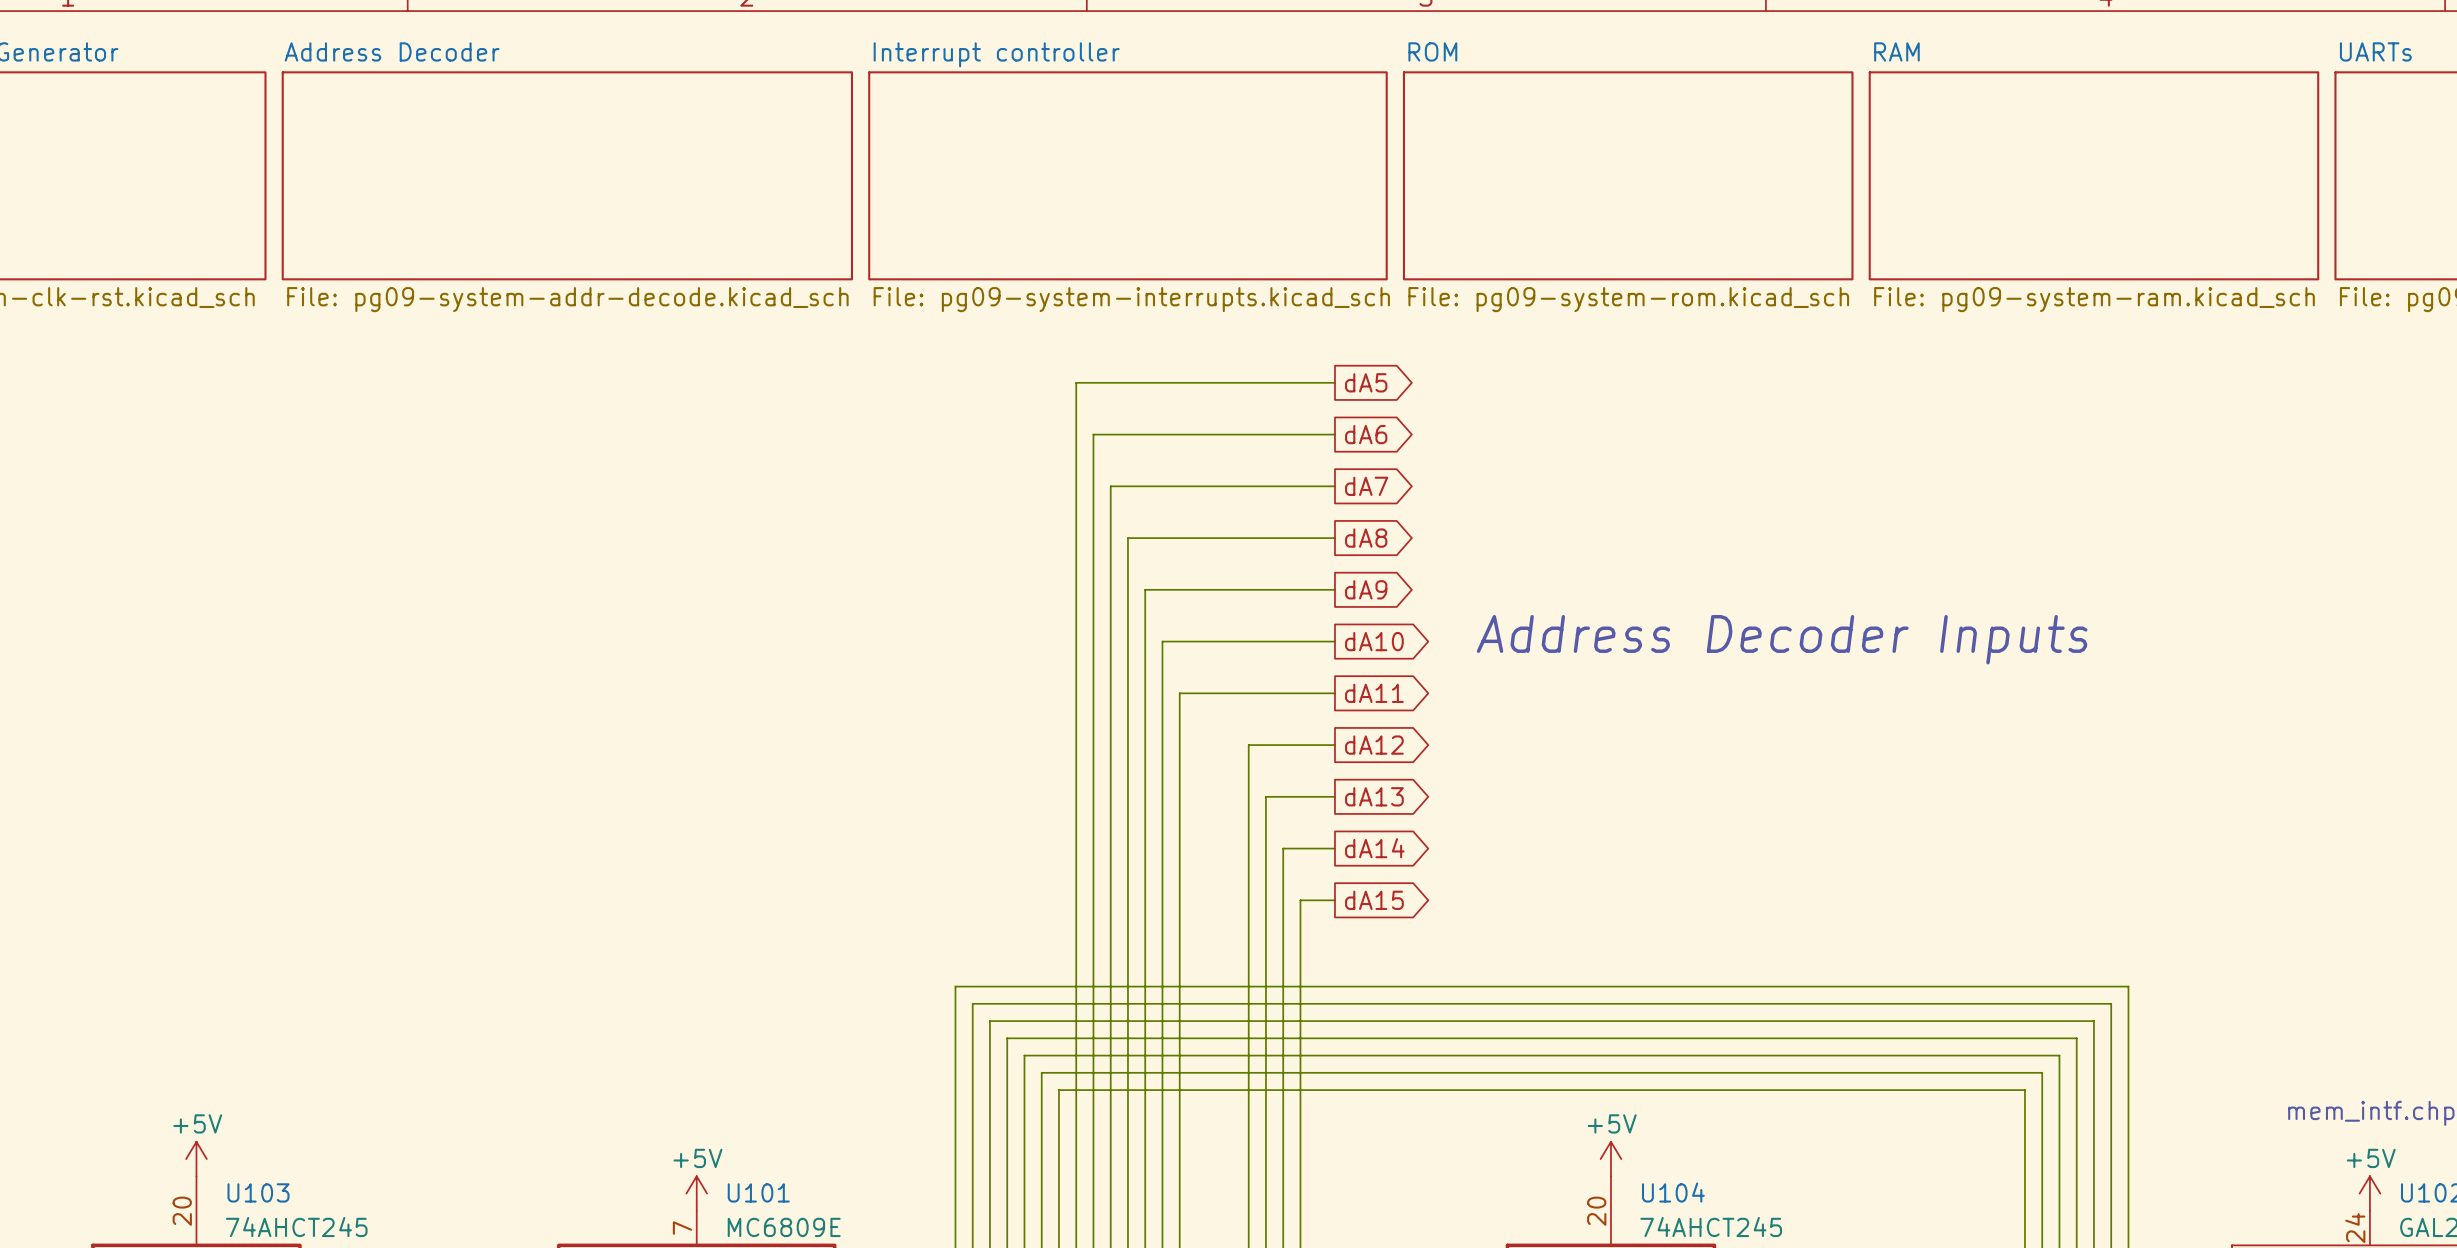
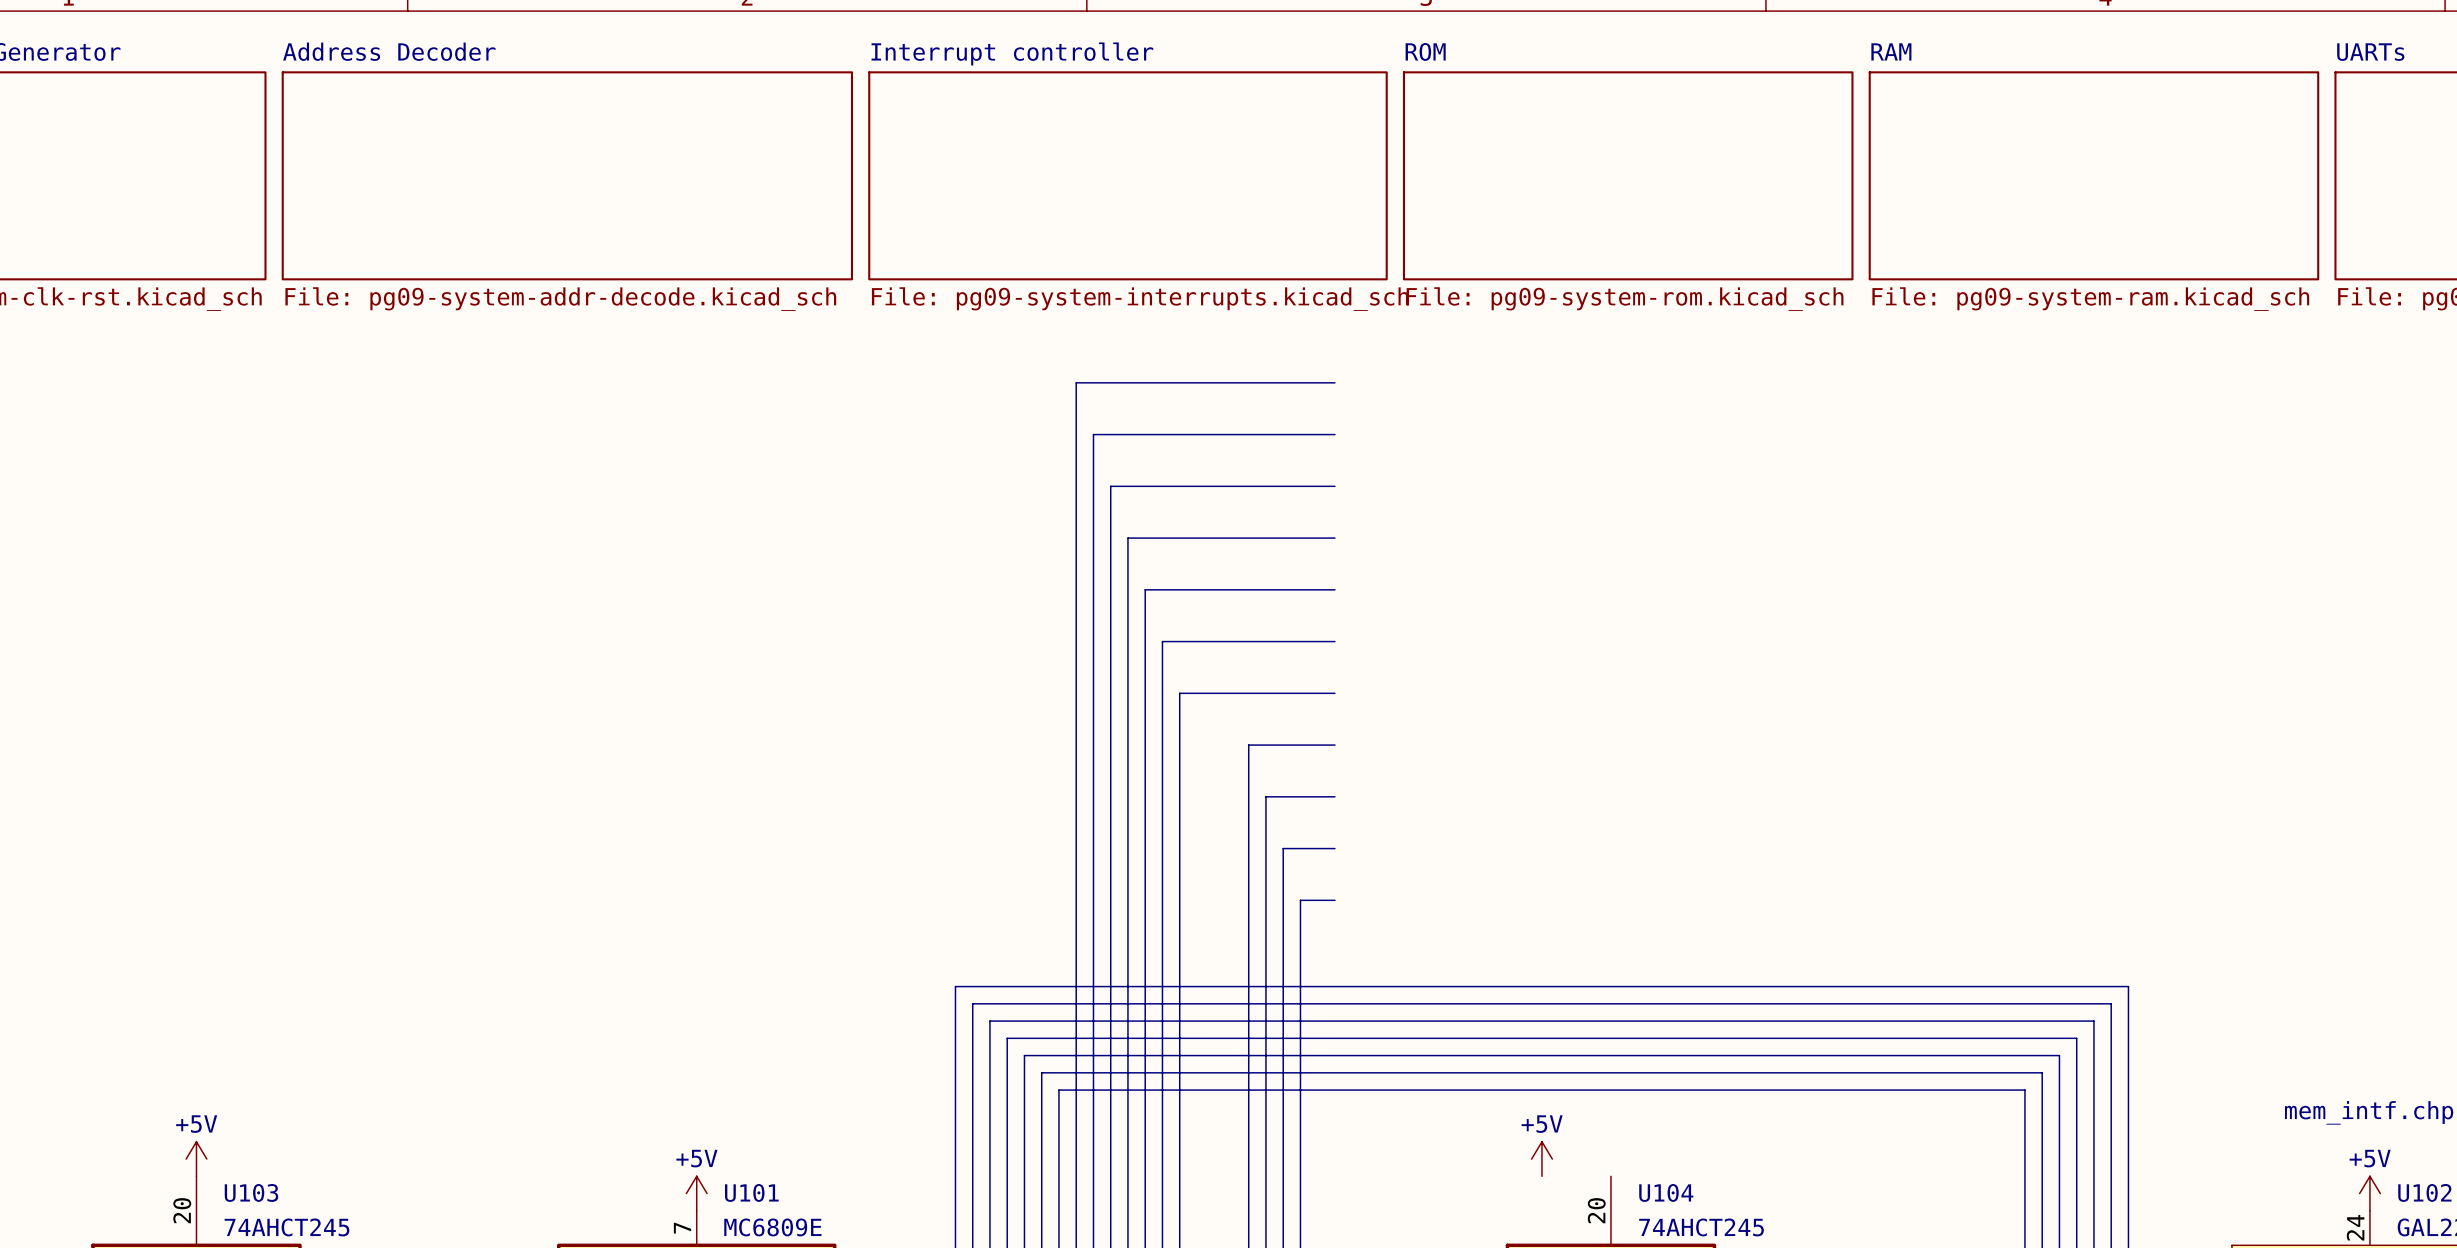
global label: dA5 (1366, 382) -> none
global label: dA6 (1366, 434) -> none
global label: dA7 (1366, 486) -> none
global label: dA8 (1366, 538) -> none
global label: dA9 (1366, 589) -> none
text: Address Decoder Inputs (1782, 639) -> none
global label: dA10 (1374, 641) -> none
global label: dA11 (1374, 693) -> none
global label: dA12 (1374, 745) -> none
global label: dA13 (1374, 796) -> none
global label: dA14 (1374, 848) -> none
global label: dA15 (1374, 900) -> none
power symbol position: +5V (1610, 1159) -> +5V (1541, 1159)

